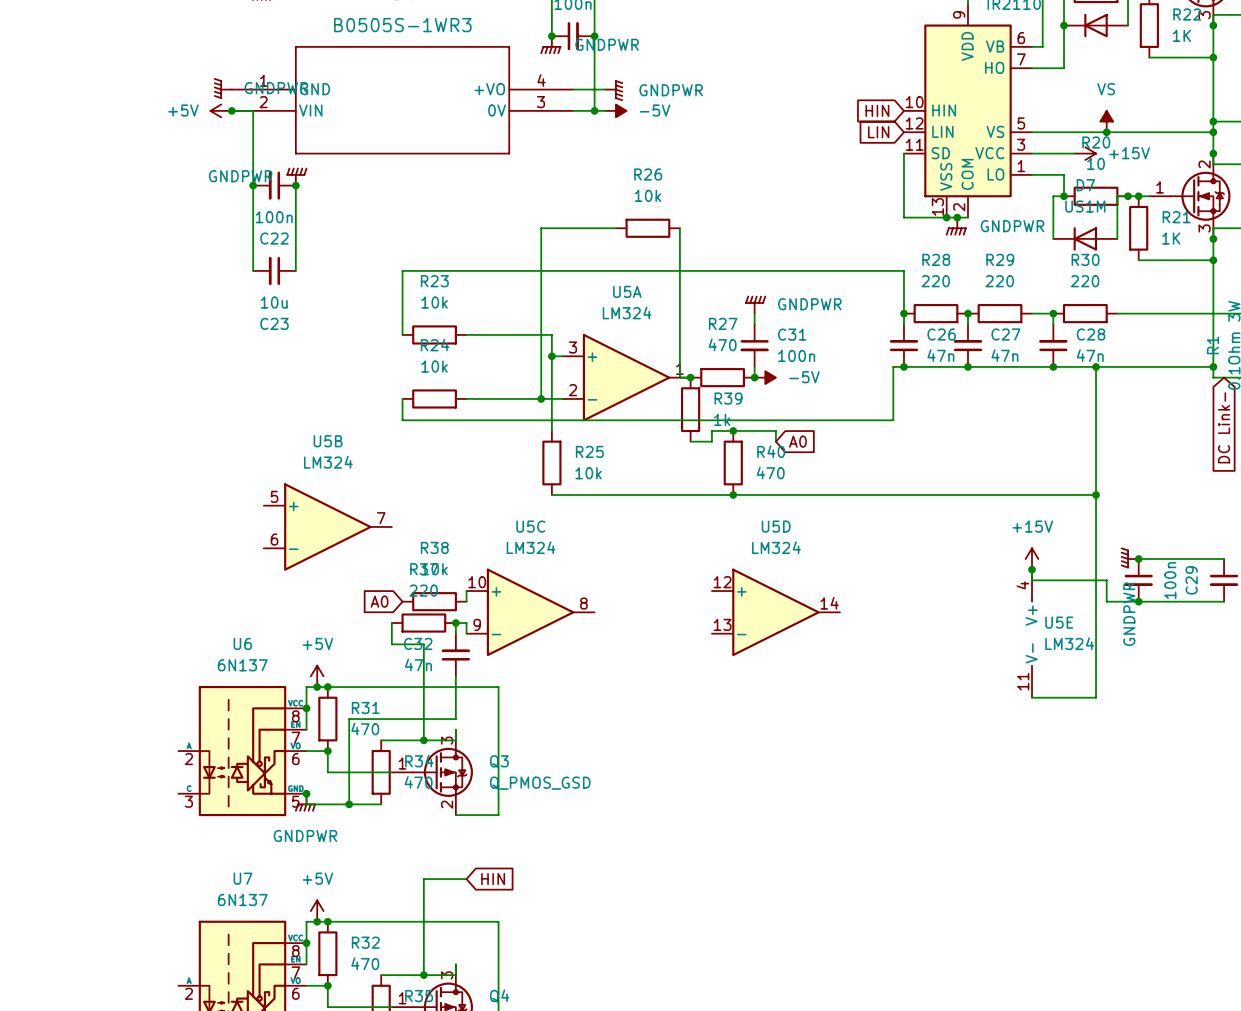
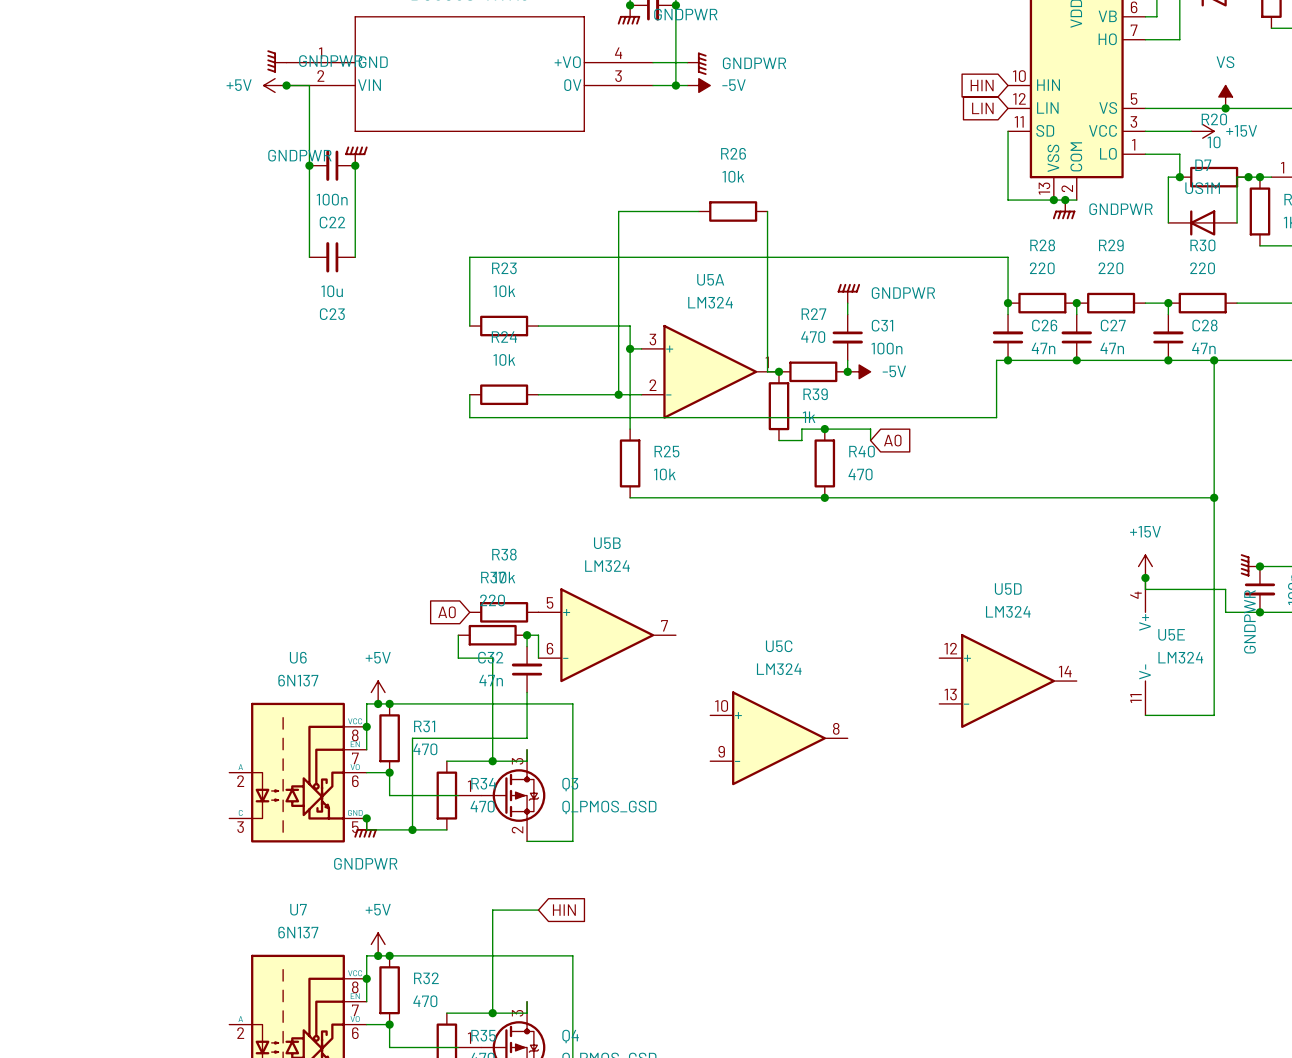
U5B position: (327, 527) -> (607, 635)
wire: (466, 591) (466, 601) -> (538, 646) (538, 658)
U5C position: (530, 612) -> (778, 738)
U5D position: (775, 612) -> (1008, 681)

